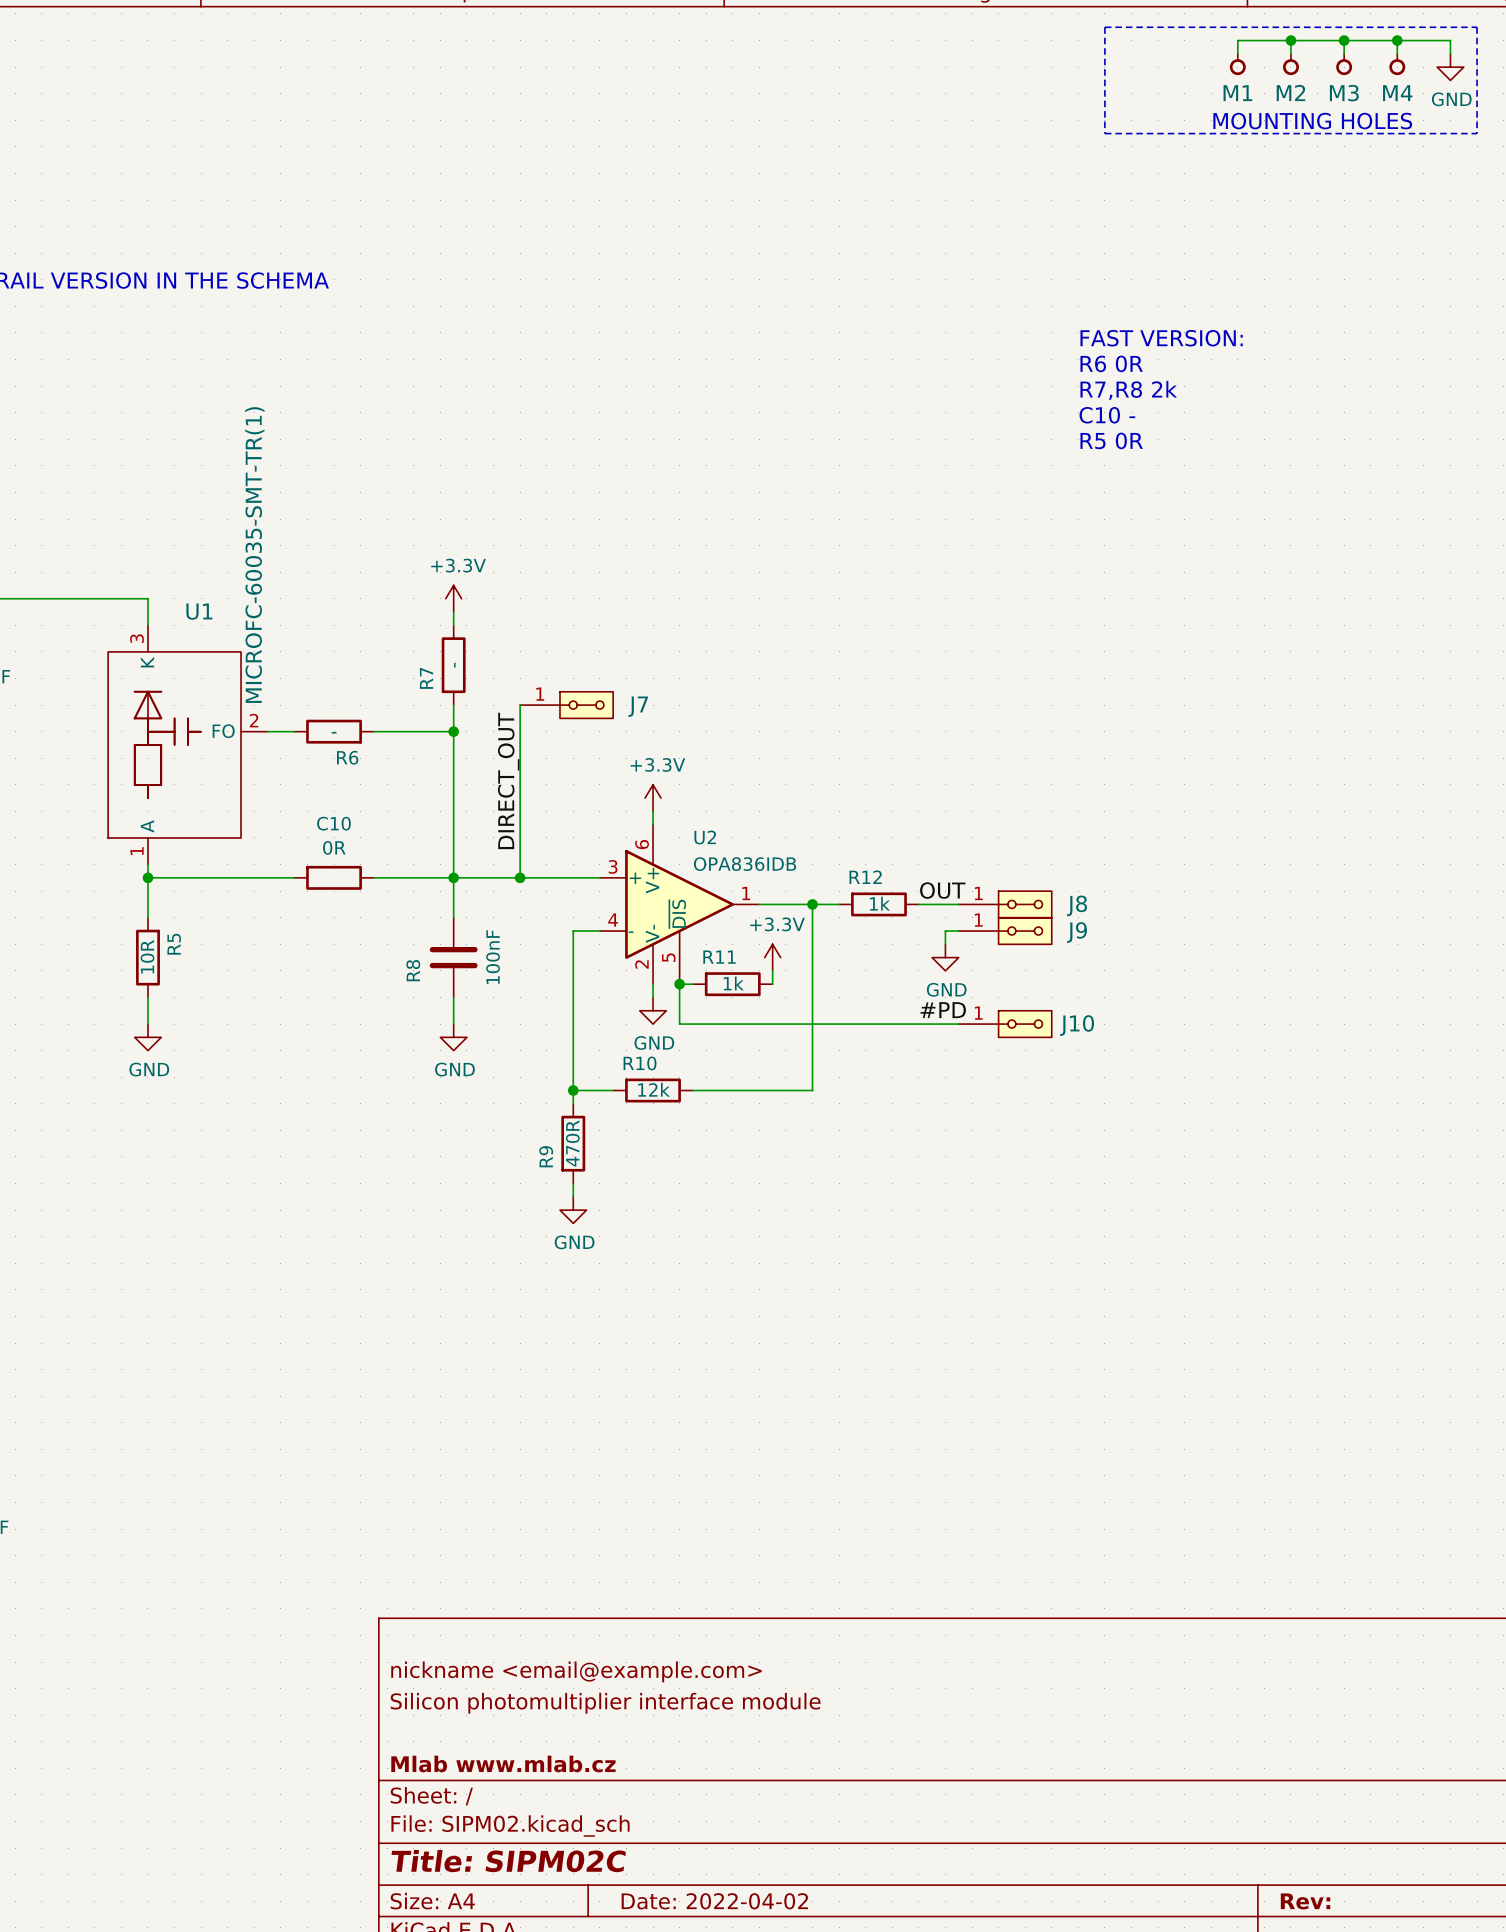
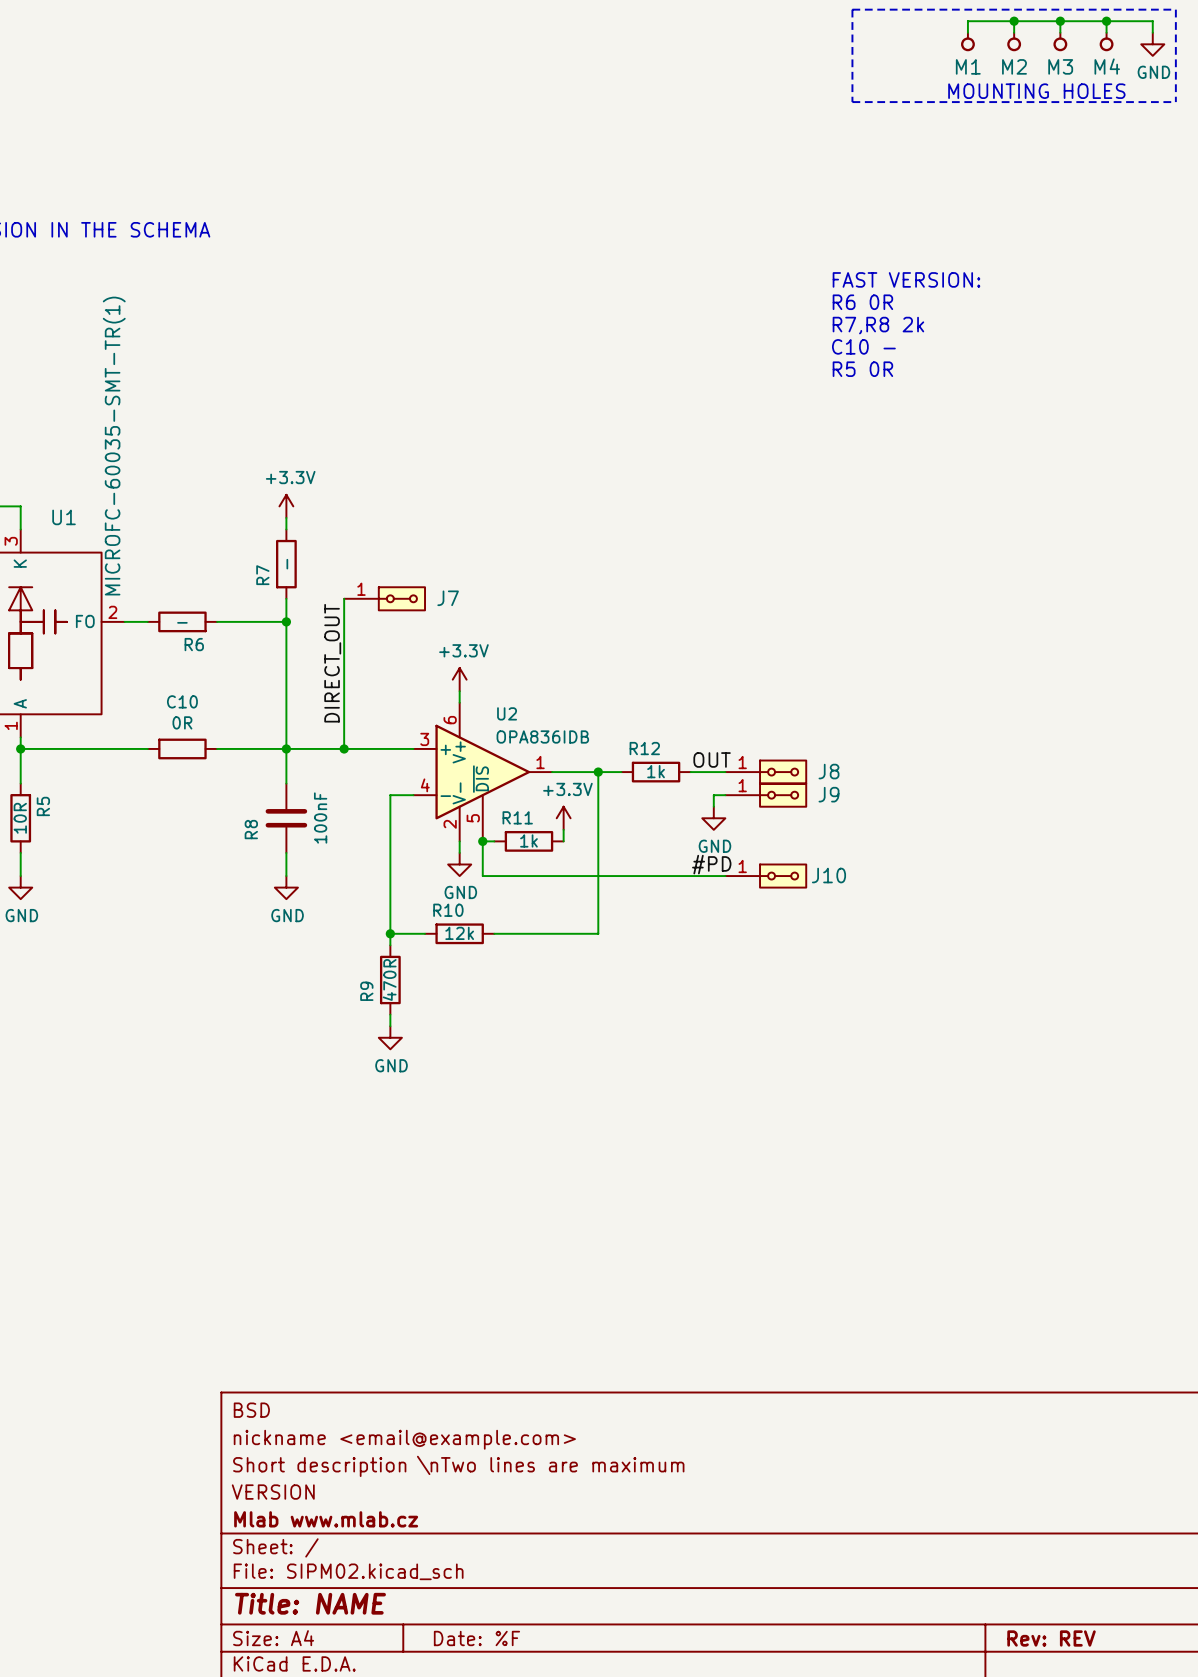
title block: none -> BSD (251, 1410)
title block: Silicon photomultiplier interface module (605, 1703) -> Short description \nTwo lines are maximum (458, 1466)
title block: none -> VERSION (273, 1492)
title block: Title: SIPM02C (508, 1861) -> Title: NAME (310, 1603)
title block: Date: 2022-04-02 (714, 1901) -> Date: %F (476, 1638)
title block: Rev: (1305, 1901) -> Rev: REV (1051, 1638)

